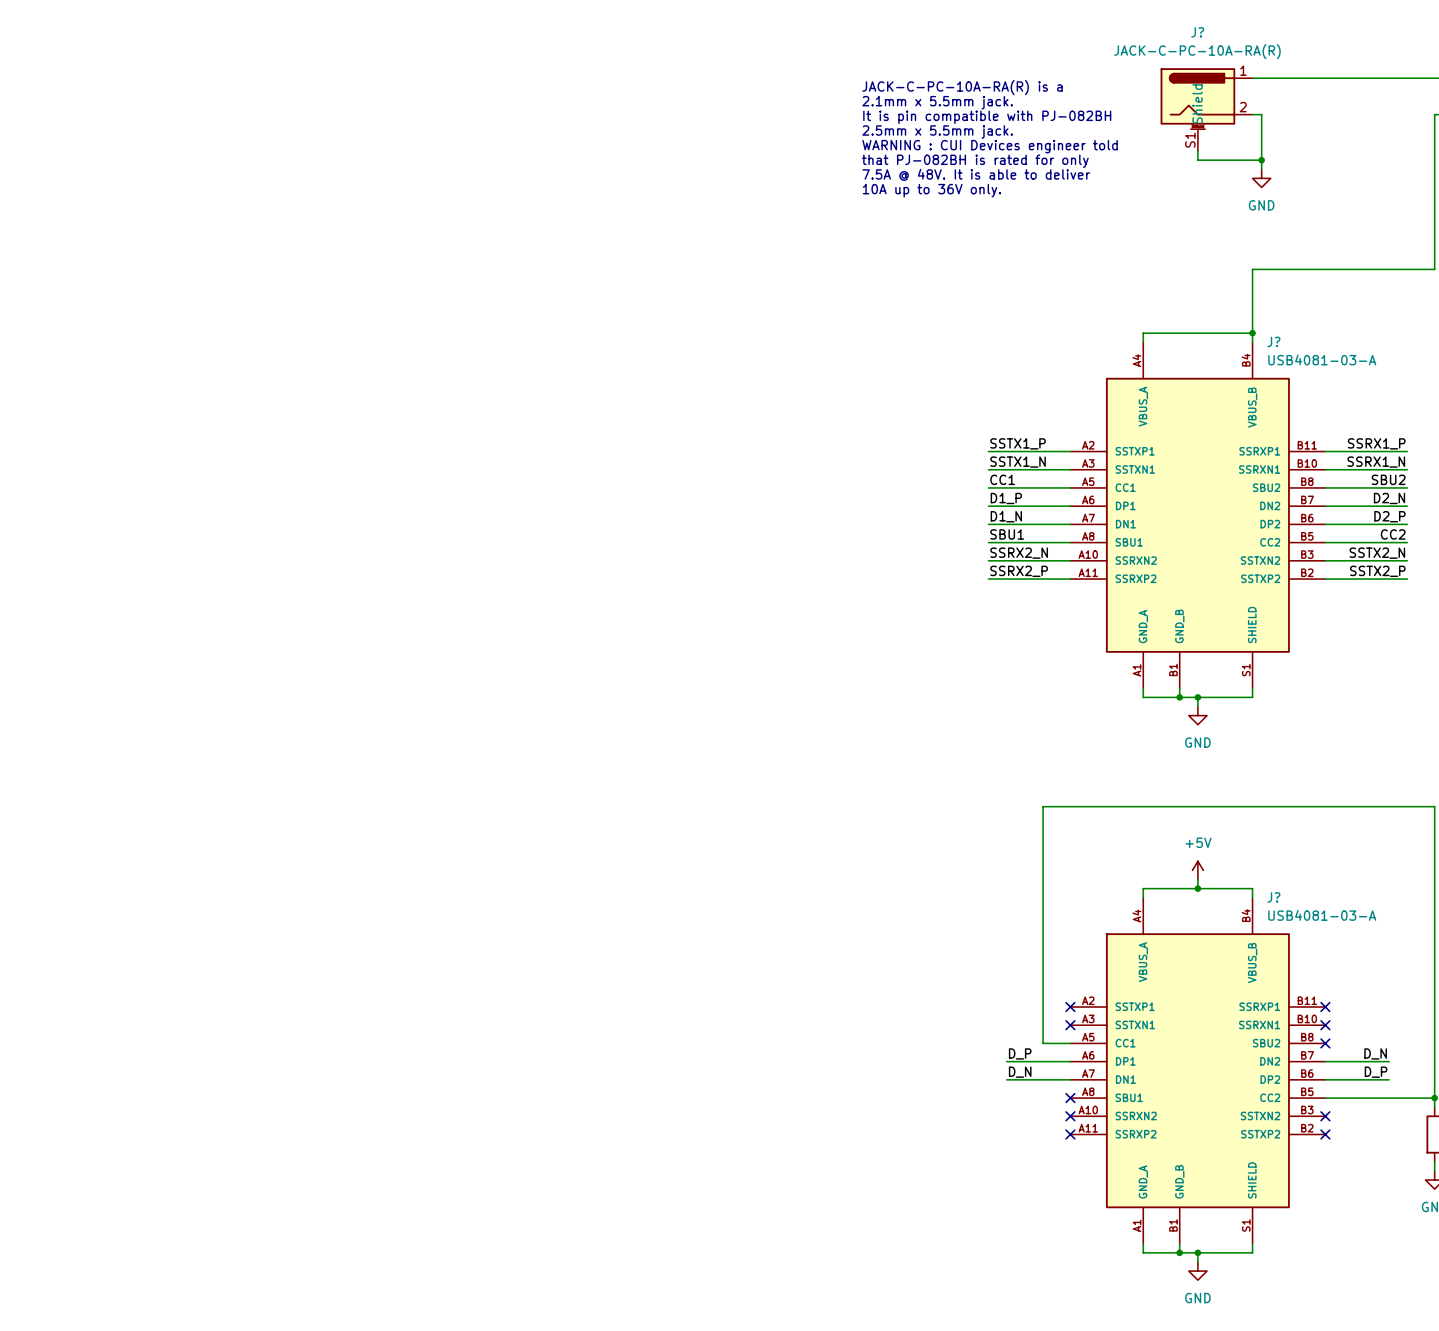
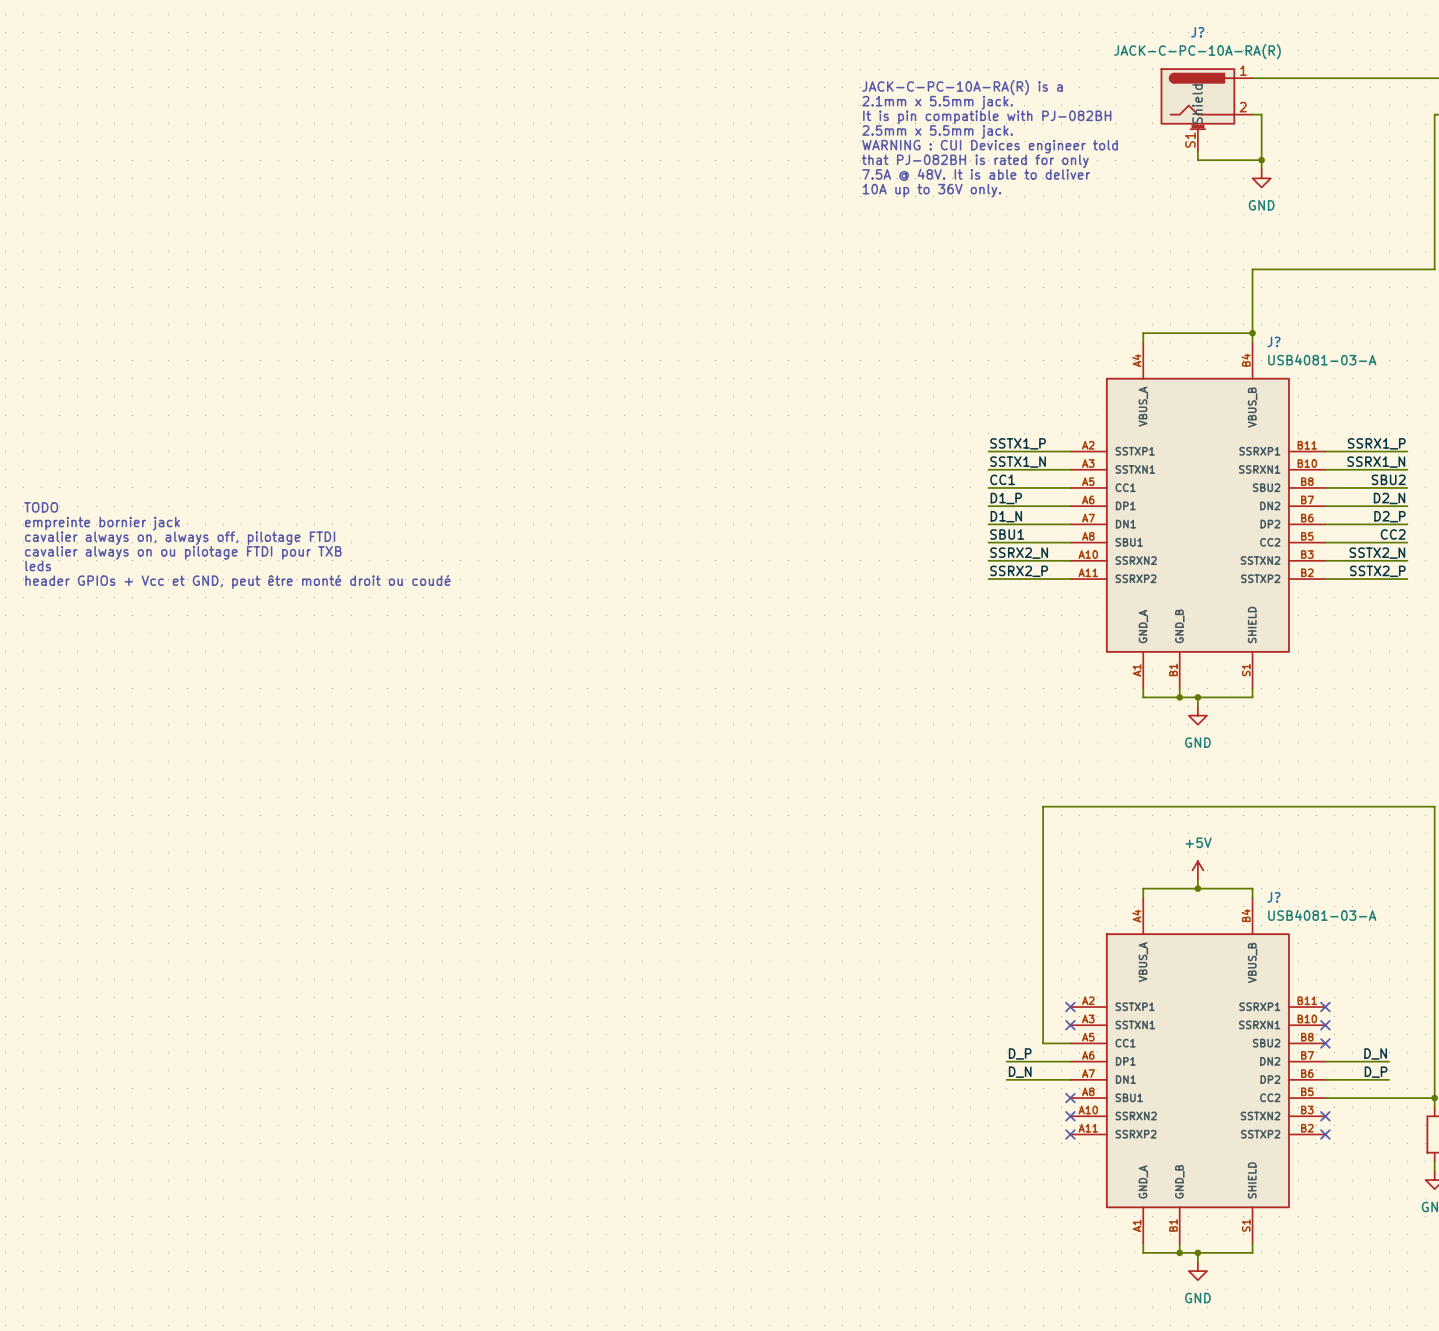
text: none -> TODO (41, 507)
text: none -> empreinte bornier jack (102, 523)
text: none -> cavalier always on, always off, pilotage FTDI (180, 538)
text: none -> cavalier always on ou pilotage FTDI pour TXB (183, 552)
text: none -> leds (38, 566)
text: none -> header GPIOs + Vcc et GND, peut être monté droit ou coudé (237, 581)

